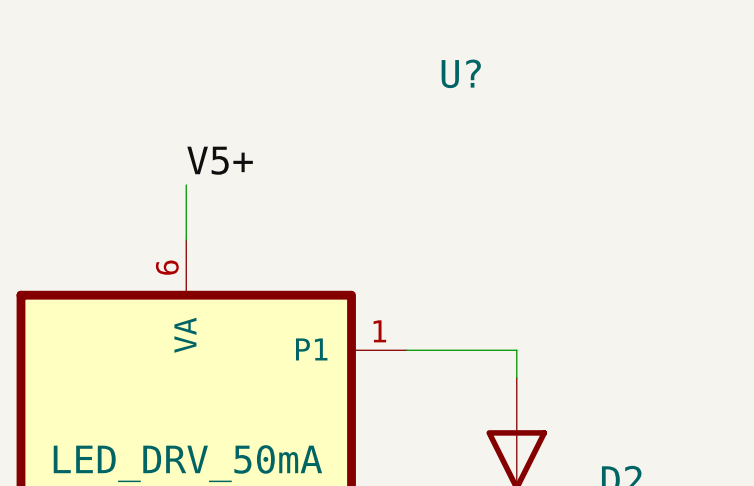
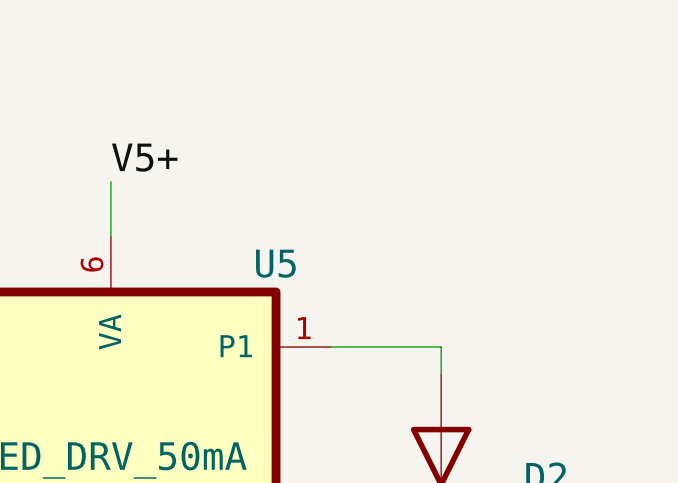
U? name: U? (461, 73) -> U5 (275, 263)

